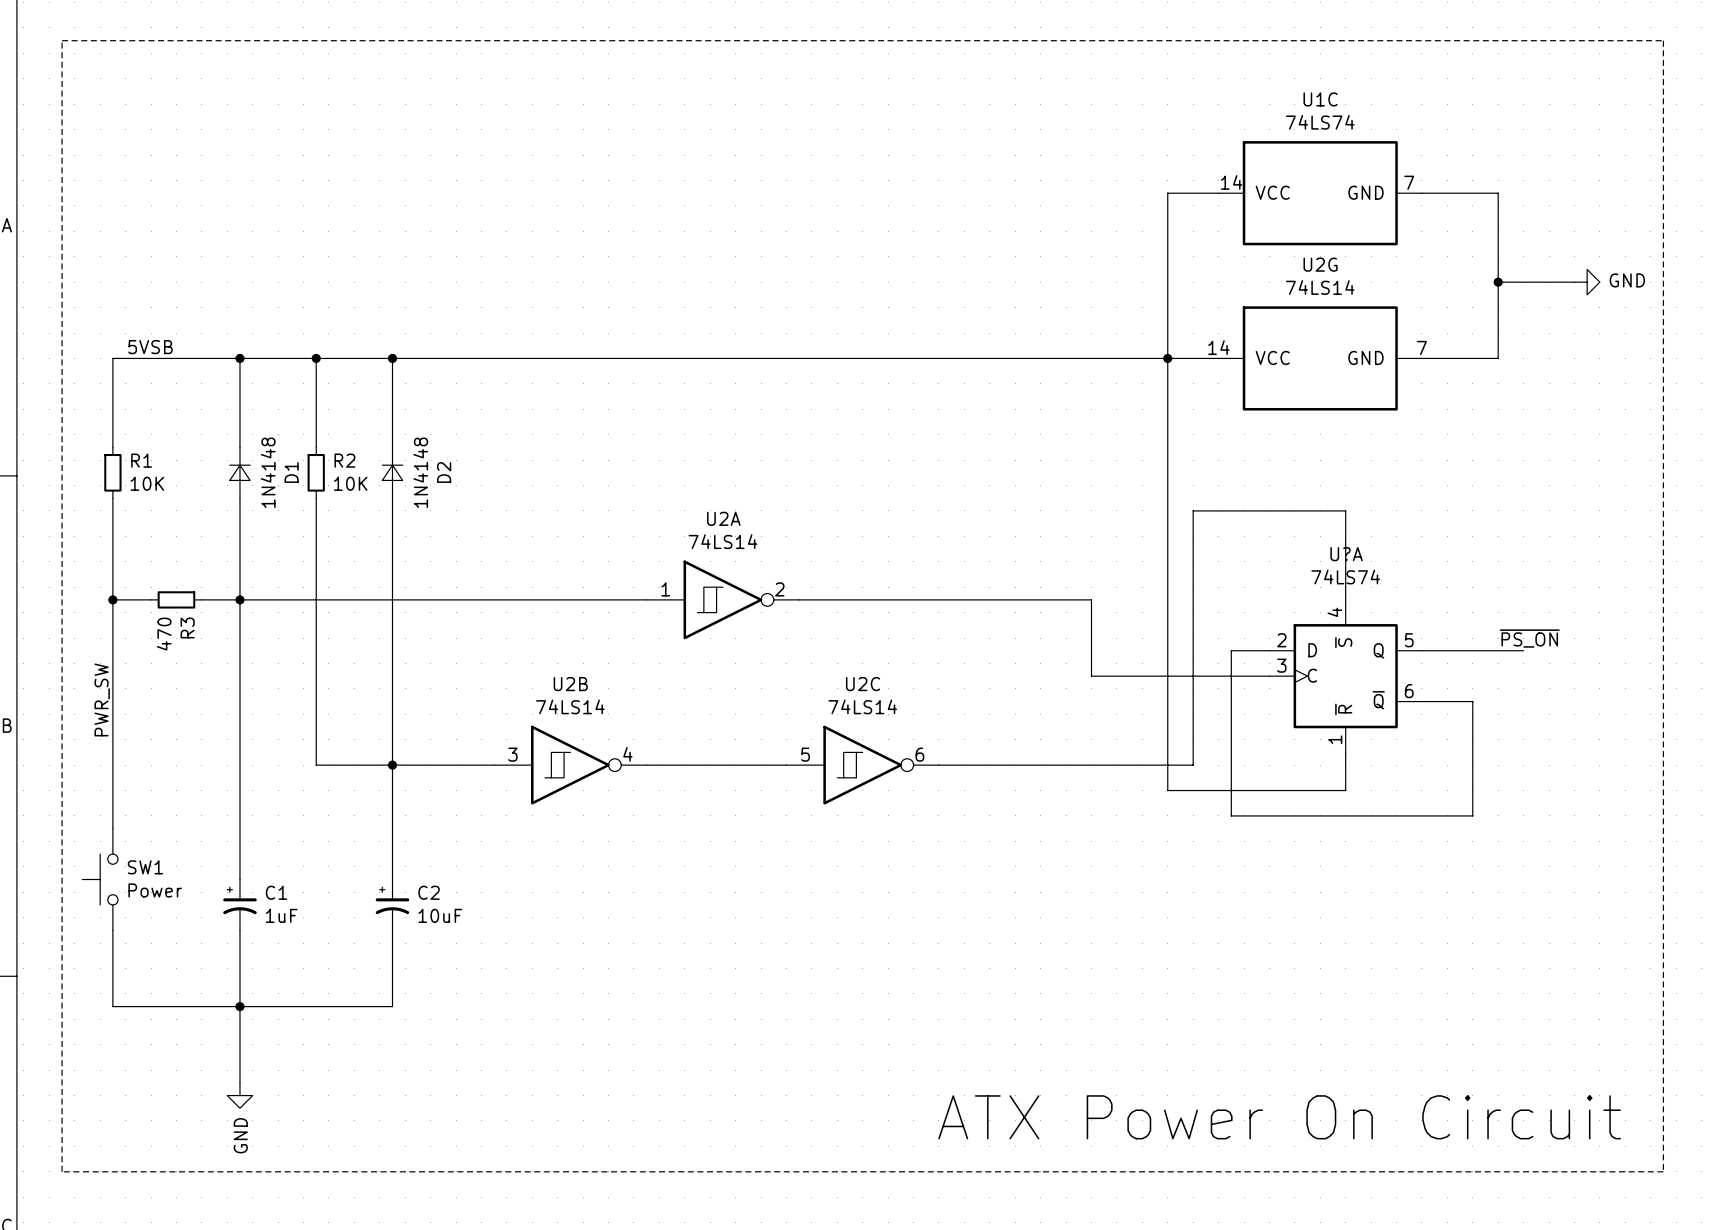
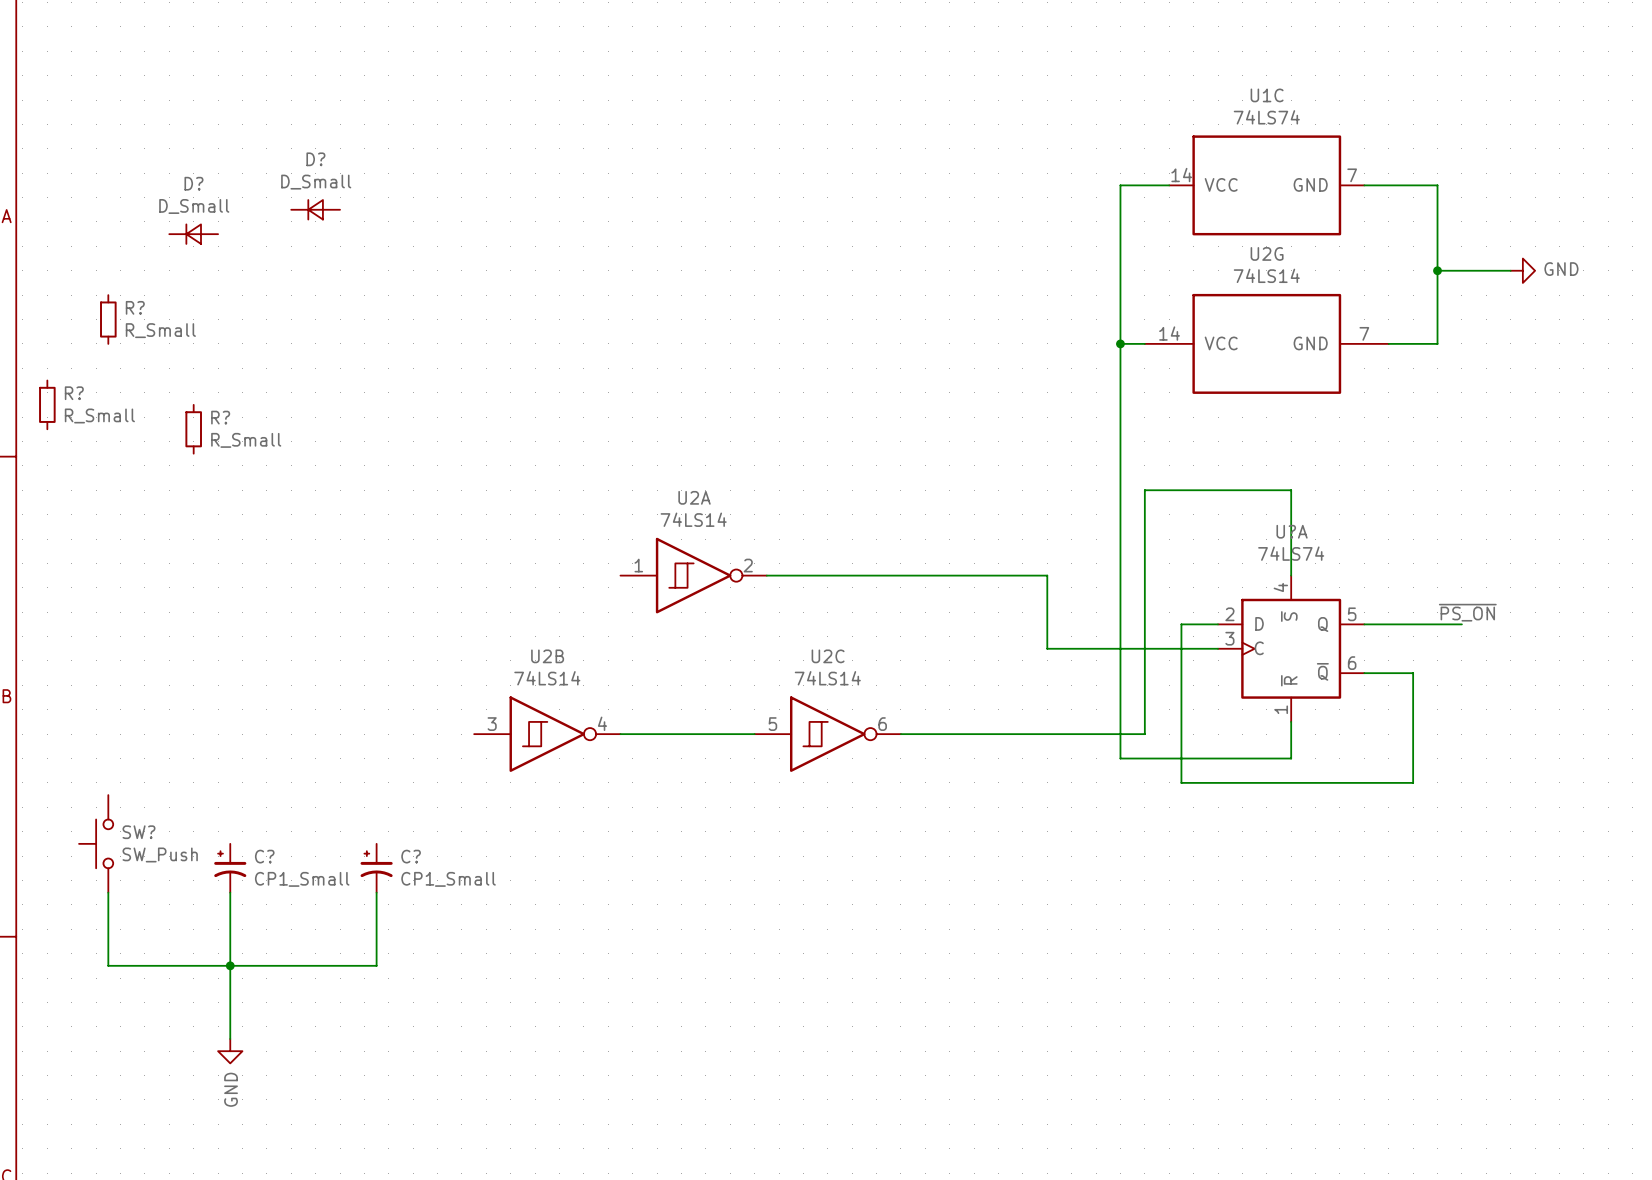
line: (62, 40) (1663, 40) (1663, 1171) (62, 1171) (62, 40) -> none
D?: none -> D_Small (315, 209)
D?: none -> D_Small (193, 234)
R?: none -> R_Small (108, 319)
label: 5VSB (150, 347) -> none
wire: (239, 358) (239, 447) -> none
junction: (239, 358) -> none
wire: (316, 358) (316, 447) -> none
junction: (316, 358) -> none
wire: (392, 358) (392, 447) -> none
junction: (392, 358) -> none
wire: (1167, 358) (112, 358) (112, 447) -> none
R?: none -> R_Small (47, 404)
R?: none -> R_Small (193, 429)
R1: 10K (112, 472) -> none
D1: 1N4148 (239, 472) -> none
R2: 10K (316, 472) -> none
D2: 1N4148 (392, 472) -> none
wire: (112, 498) (112, 828) -> none
wire: (239, 498) (239, 879) -> none
wire: (316, 498) (316, 765) (494, 765) -> none
wire: (392, 498) (392, 879) -> none
wire: (112, 599) (151, 599) -> none
junction: (112, 599) -> none
R3: 470 (176, 599) -> none
wire: (201, 599) (646, 599) -> none
junction: (239, 599) -> none
label: PWR_SW (102, 699) -> none
junction: (392, 765) -> none
SW1 name: SW1 (145, 867) -> SW? (138, 832)
SW1 value: Power (155, 890) -> SW_Push (160, 854)
C1 name: C1 (276, 892) -> C? (264, 856)
C2 name: C2 (429, 892) -> C? (411, 856)
C1 value: 1uF (281, 915) -> CP1_Small (302, 879)
C2 value: 10uF (440, 915) -> CP1_Small (448, 879)
text: ATX Power On Circuit (1279, 1117) -> none

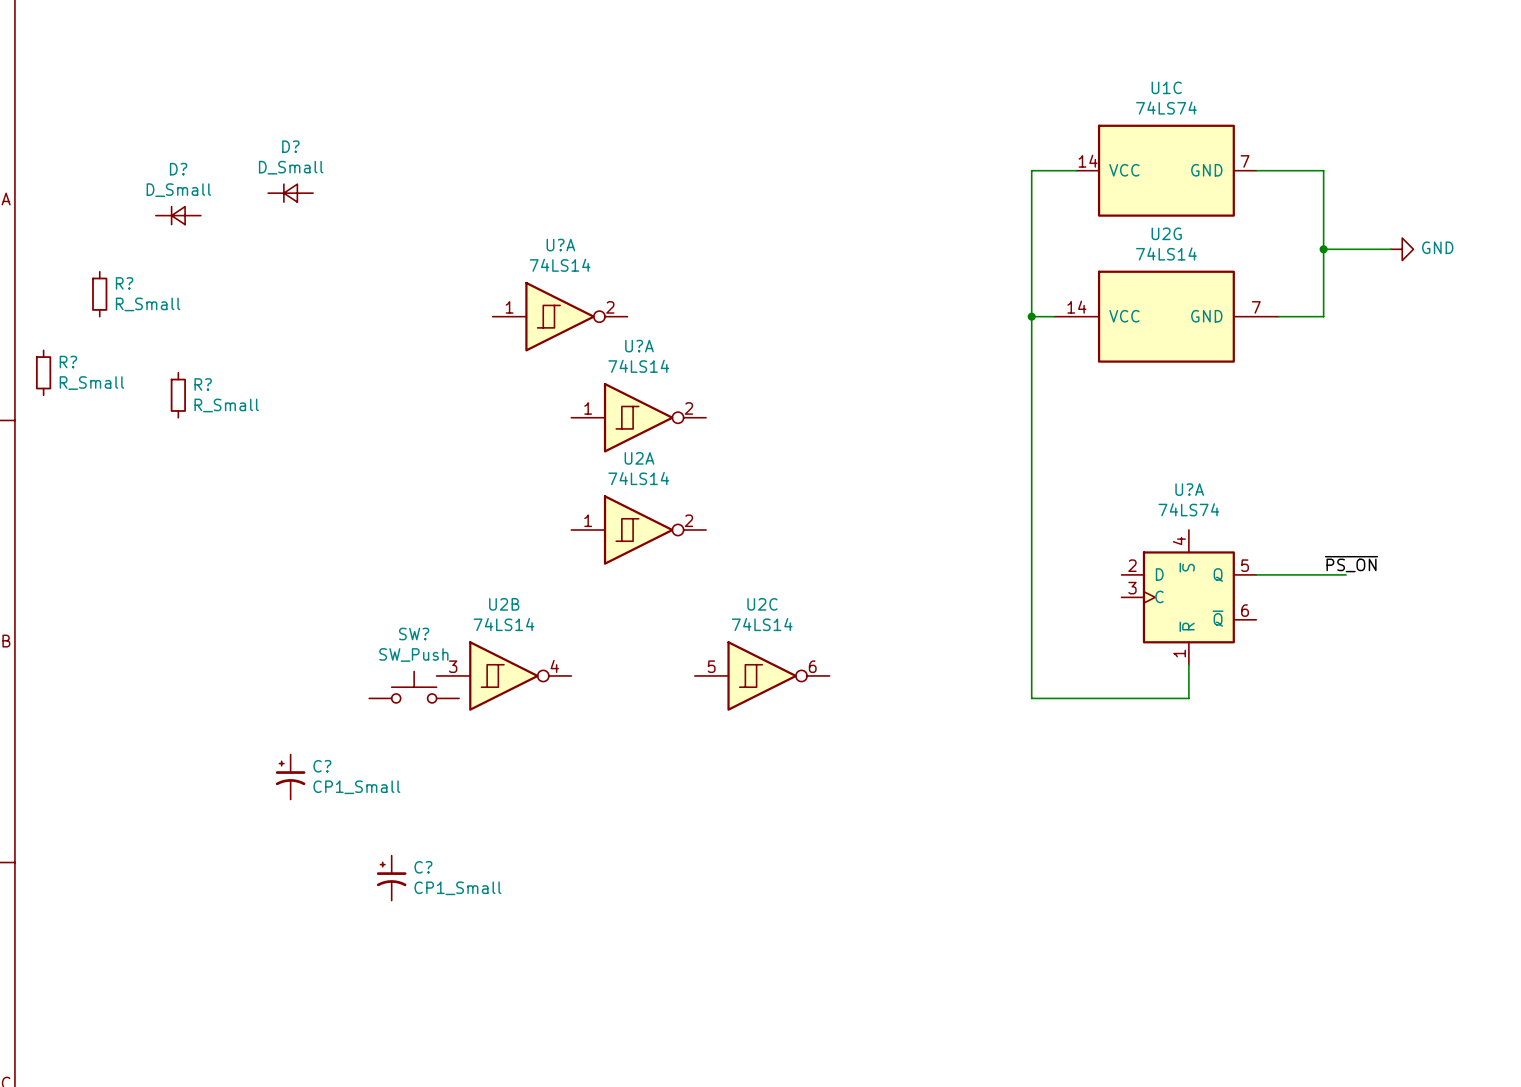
U?A: none -> 74LS14 (560, 316)
U?A: none -> 74LS14 (638, 417)
wire: (766, 575) (1047, 575) (1047, 648) (1218, 648) -> none
wire: (1291, 575) (1291, 490) (1144, 490) (1144, 734) (900, 734) -> none
wire: (1218, 624) (1181, 624) (1181, 782) (1413, 782) (1413, 673) (1364, 673) -> none
wire: (620, 734) (754, 734) -> none
SW?: none -> SW_Push (414, 687)
SW?: SW_Push (96, 843) -> none
C?: none -> CP1_Small (290, 777)
C?: CP1_Small (230, 868) -> none
C?: CP1_Small (376, 868) -> none
wire: (108, 892) (108, 965) (376, 965) (376, 892) -> none
wire: (230, 892) (230, 1038) -> none
C?: none -> CP1_Small (391, 878)
junction: (230, 965) -> none
power symbol: GND (230, 1051) -> none

